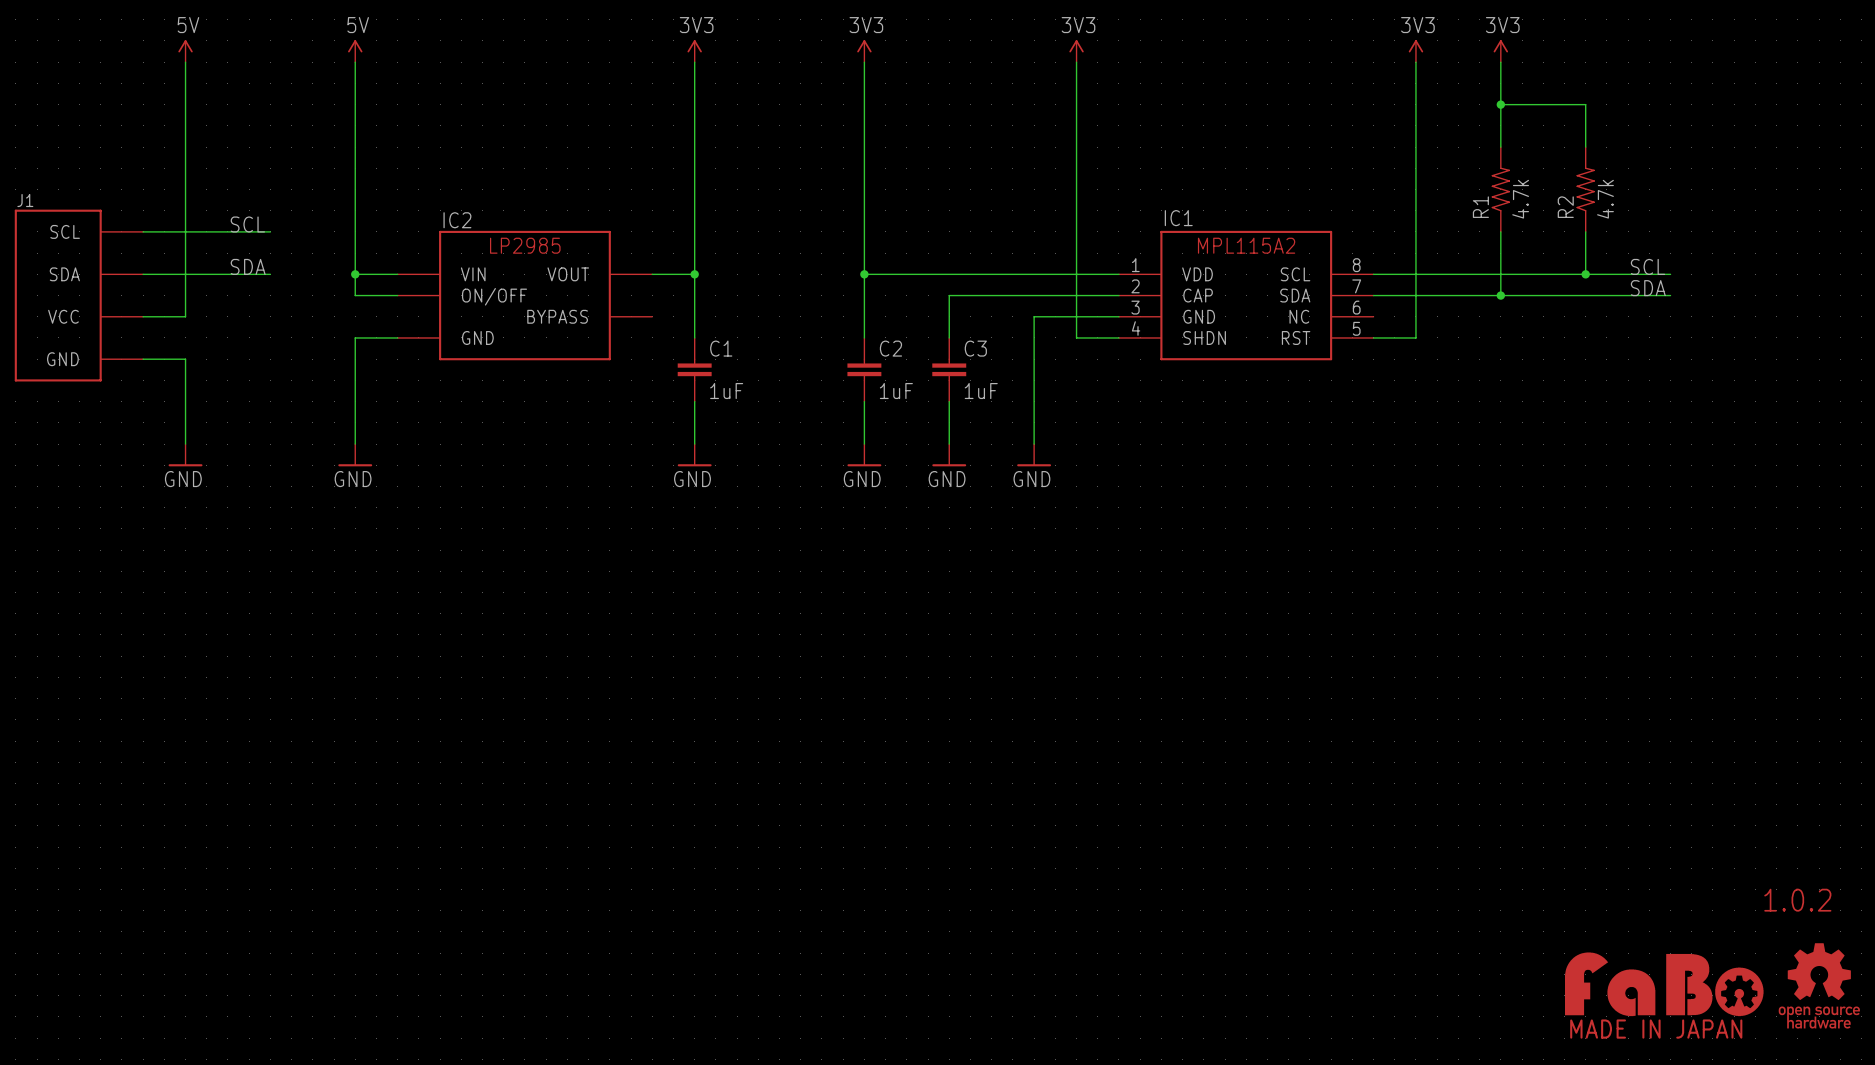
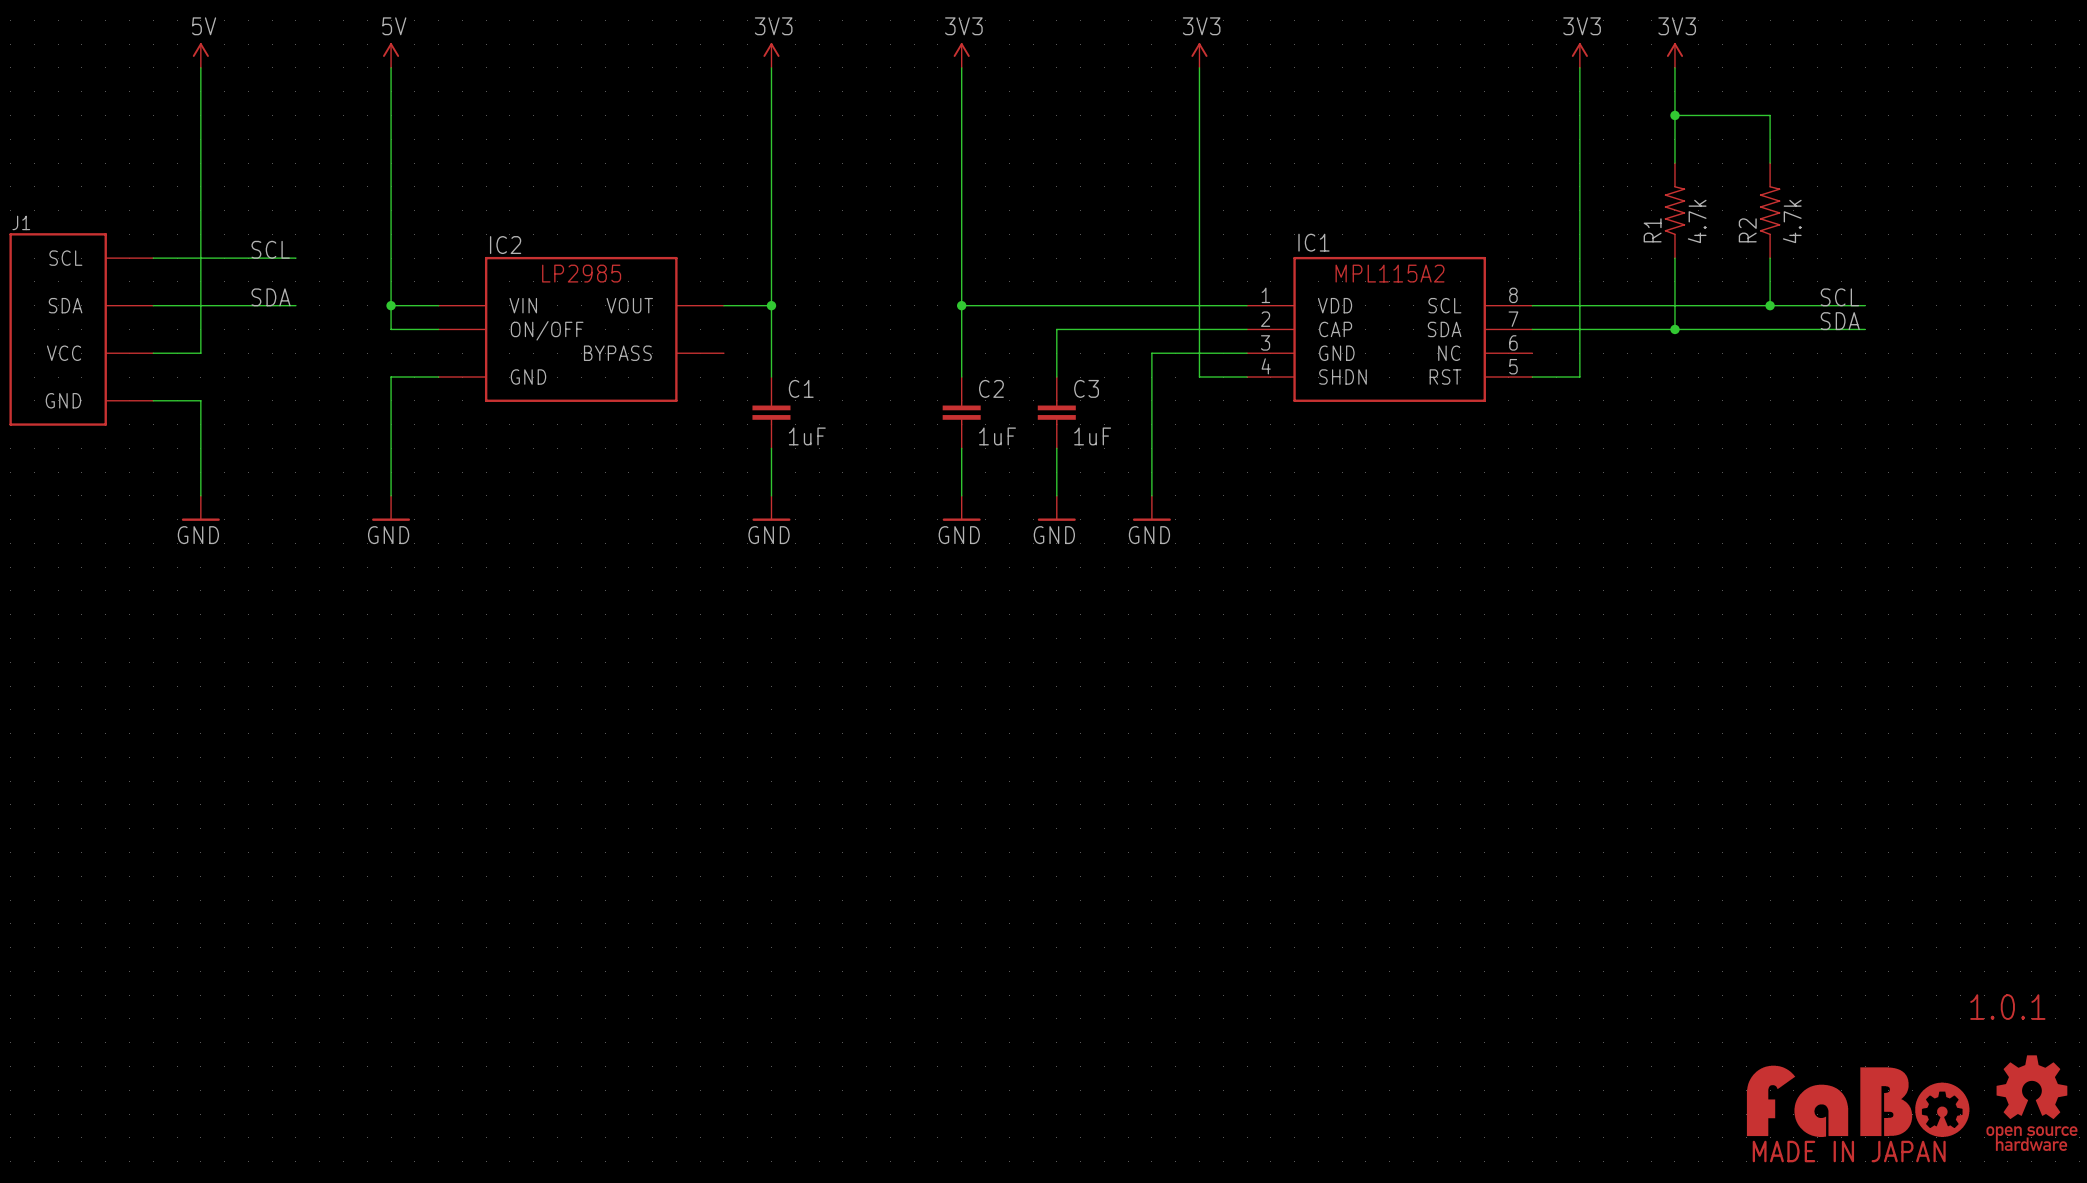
text: 1.0.2 (1797, 900) -> 1.0.1 (2007, 1007)

